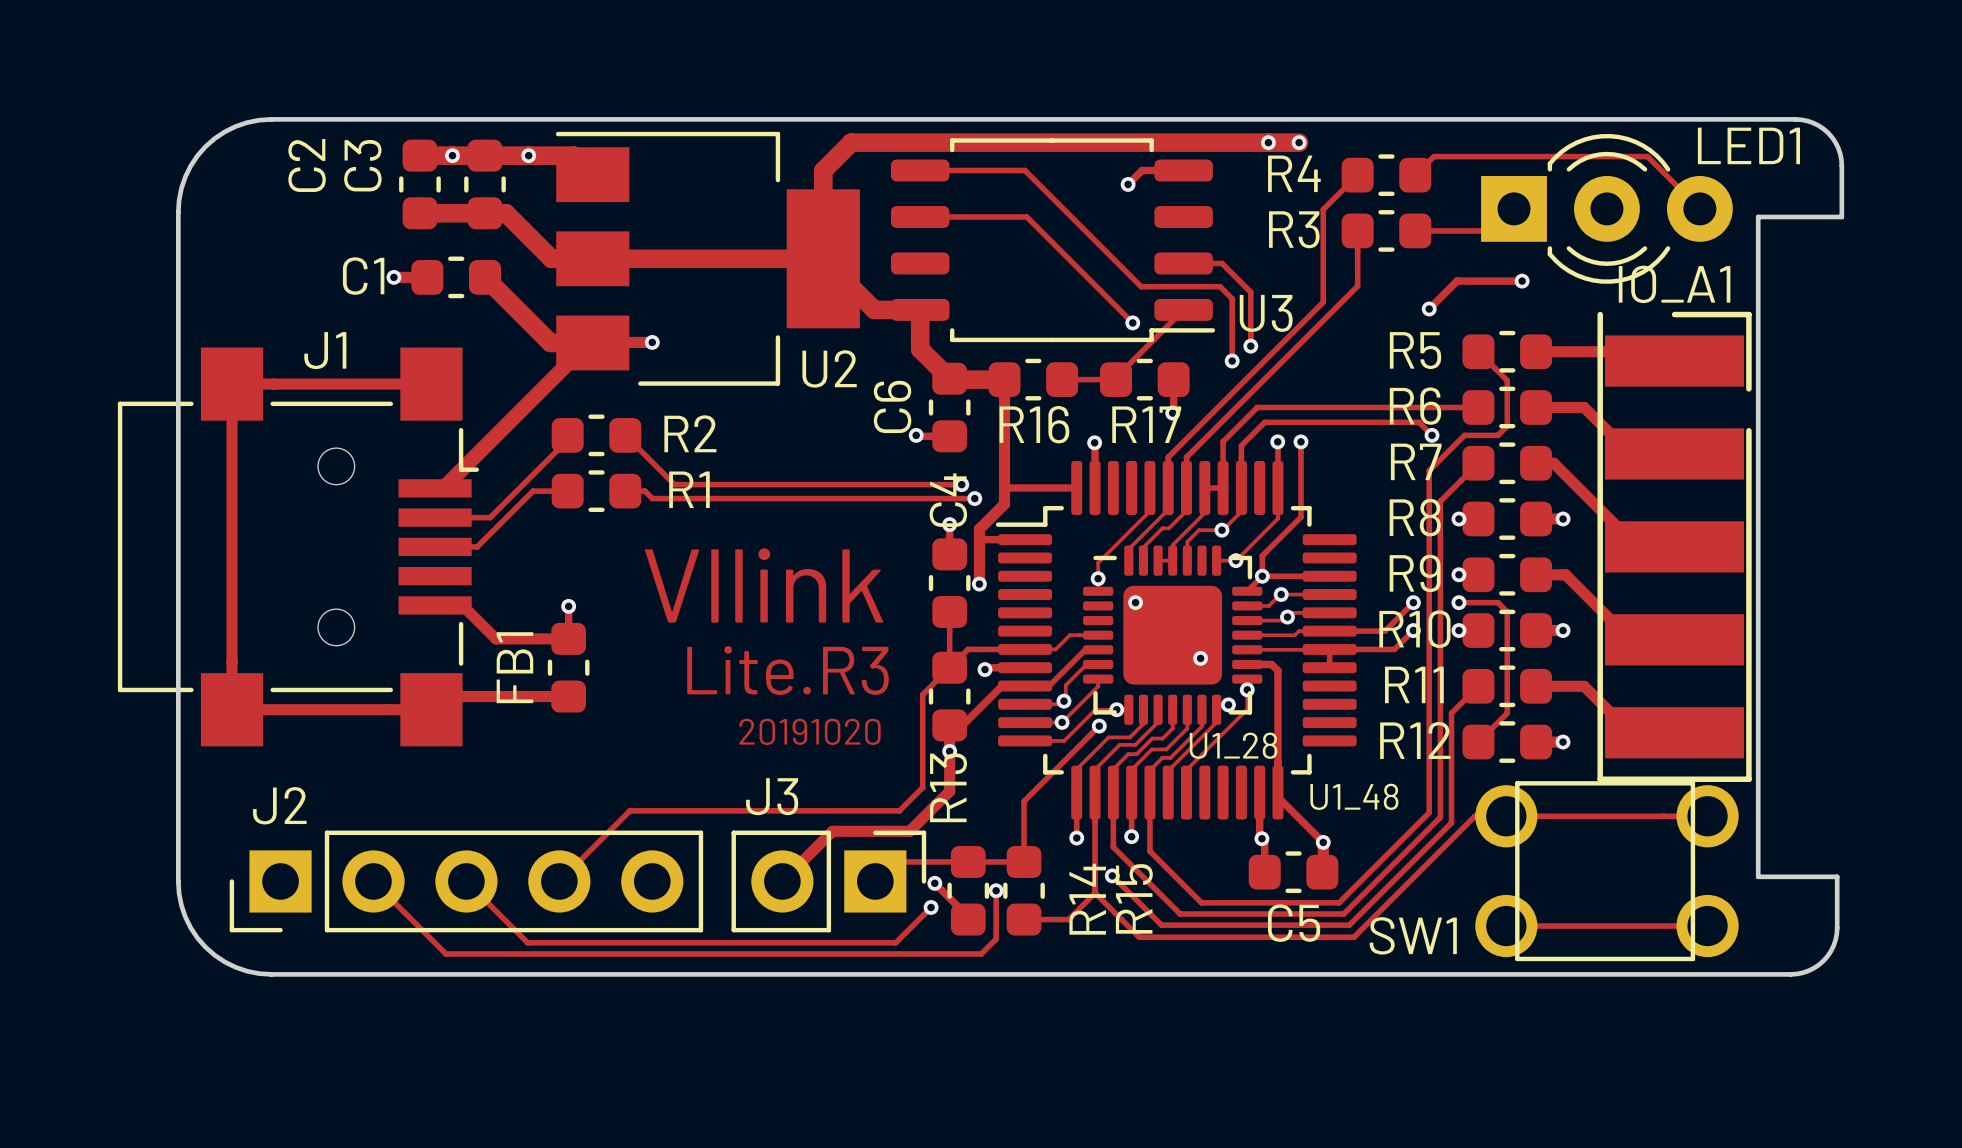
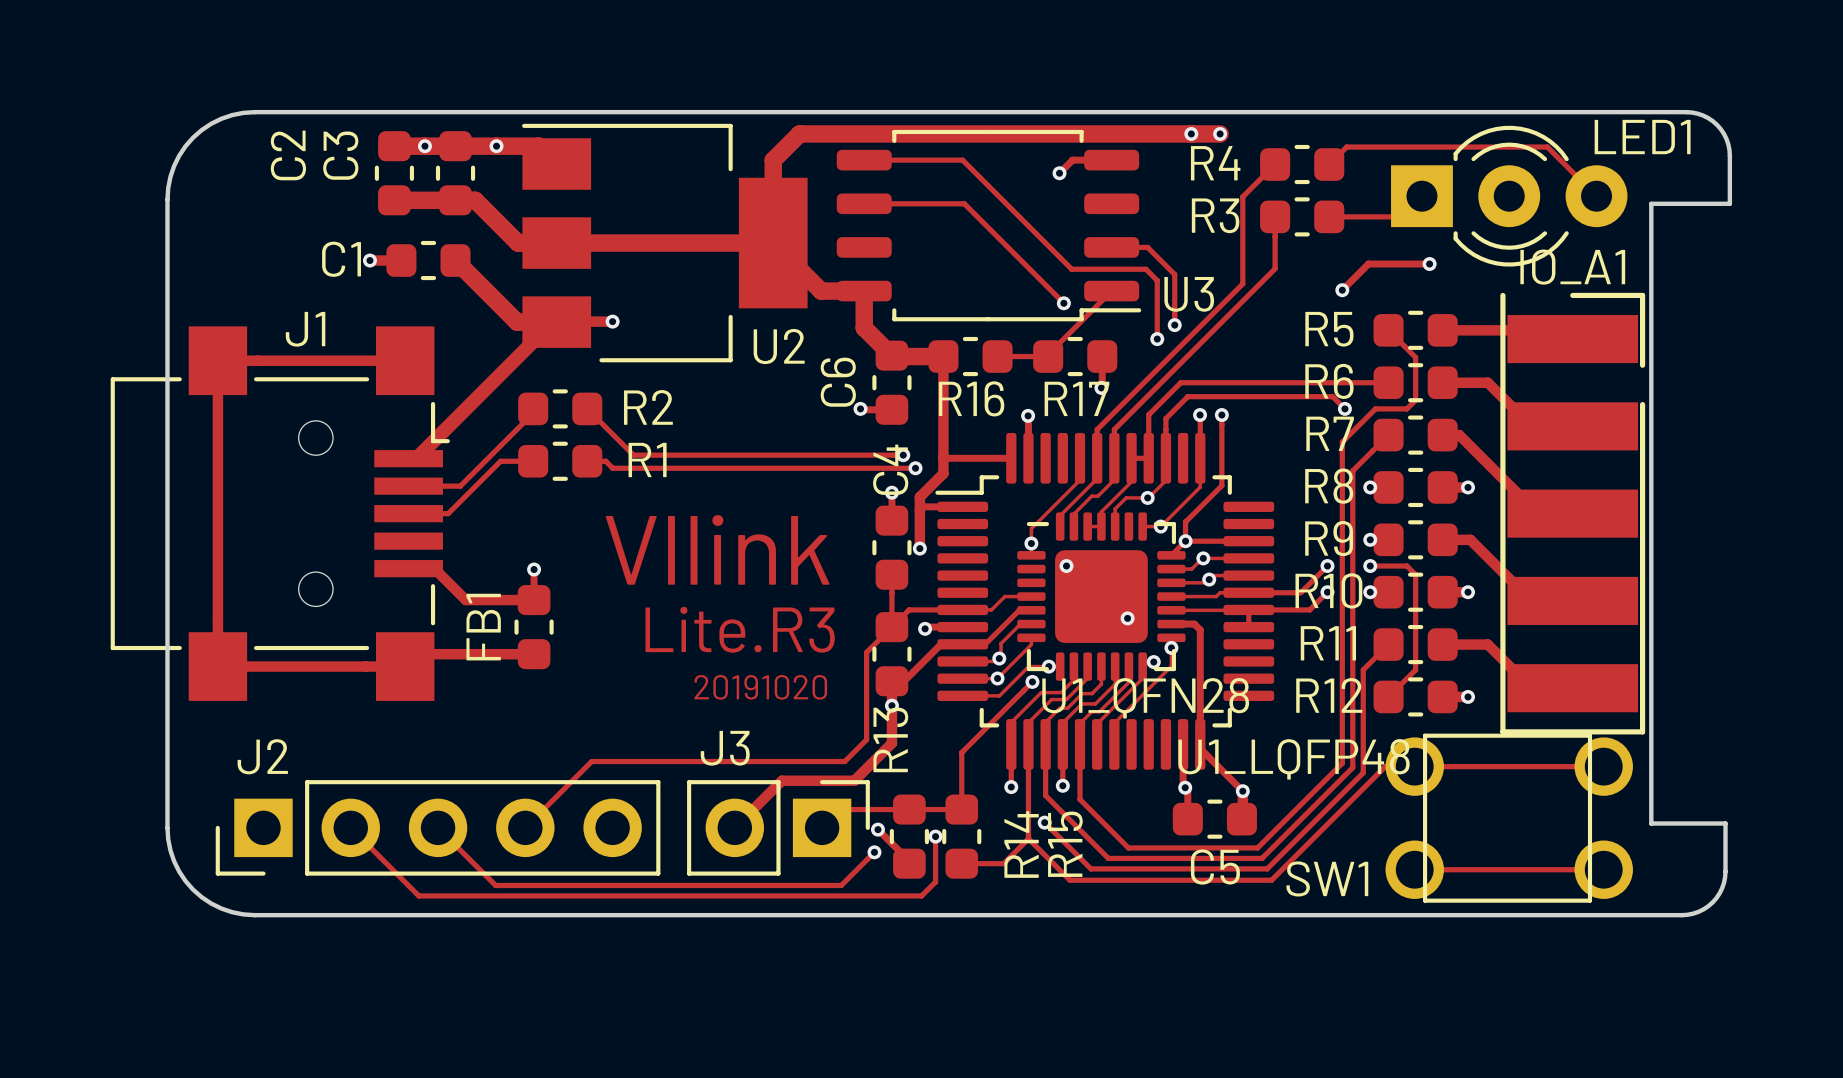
U1_28 name: U1_28 (1233, 745) -> U1_QFN28 (1145, 698)
U1_48 name: U1_48 (1354, 796) -> U1_LQFP48 (1294, 759)

